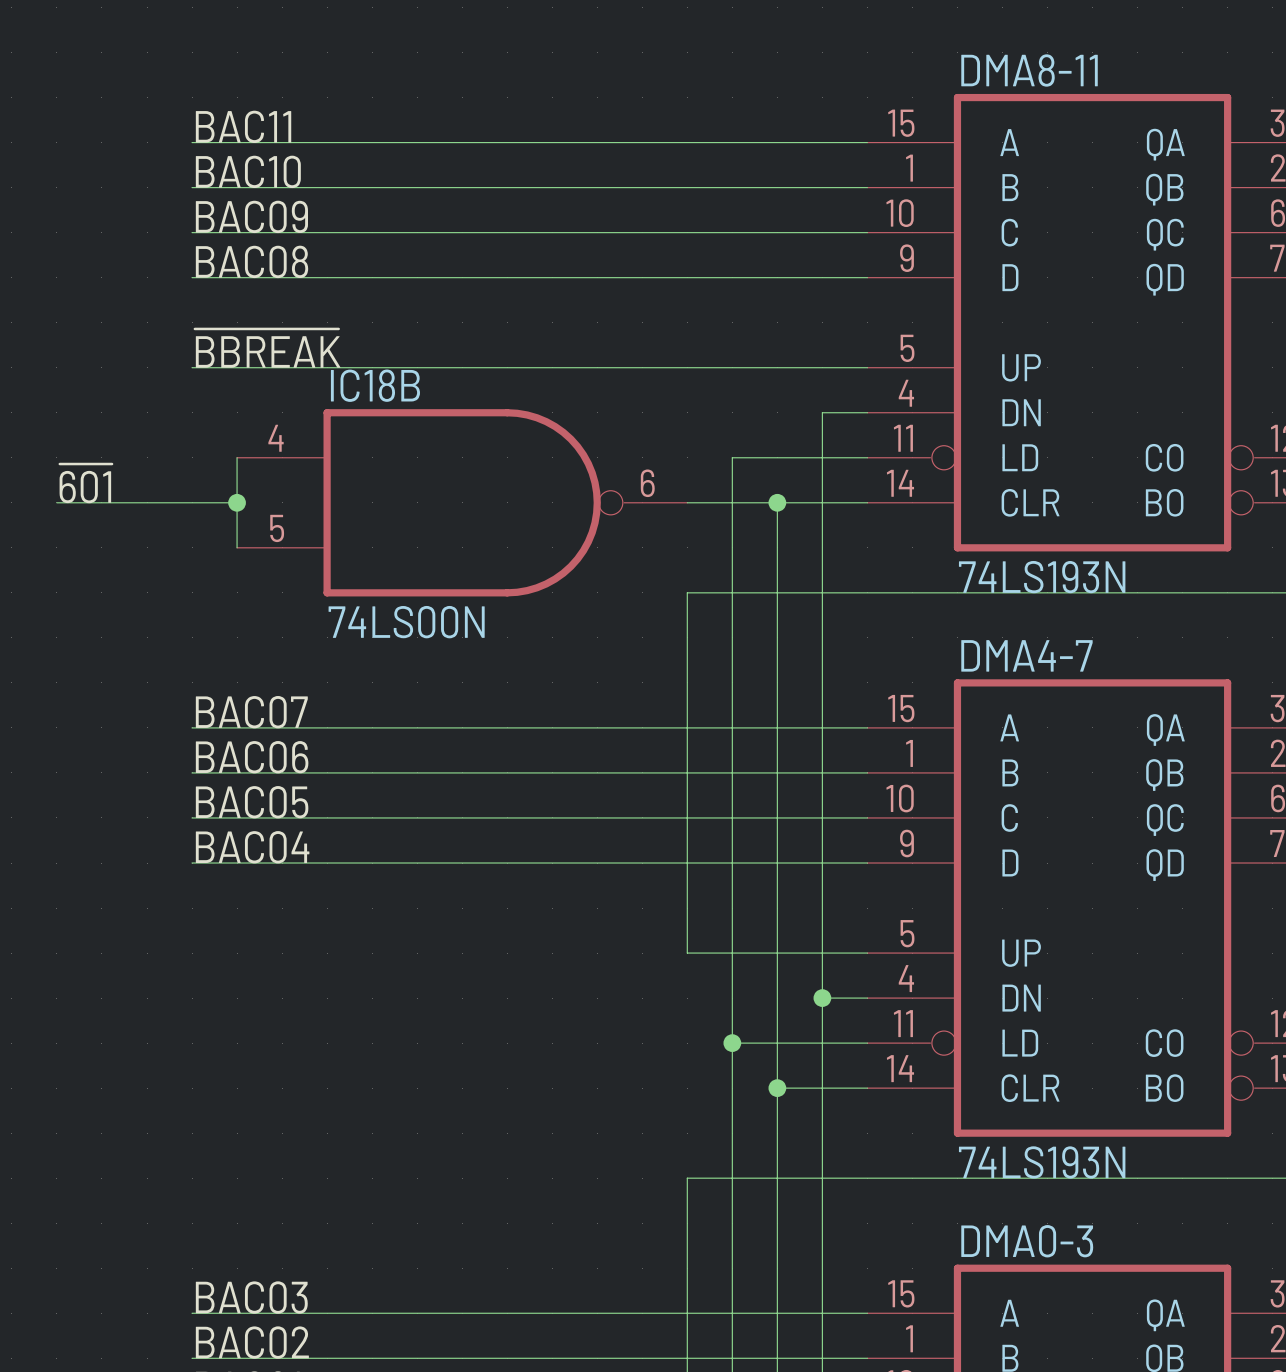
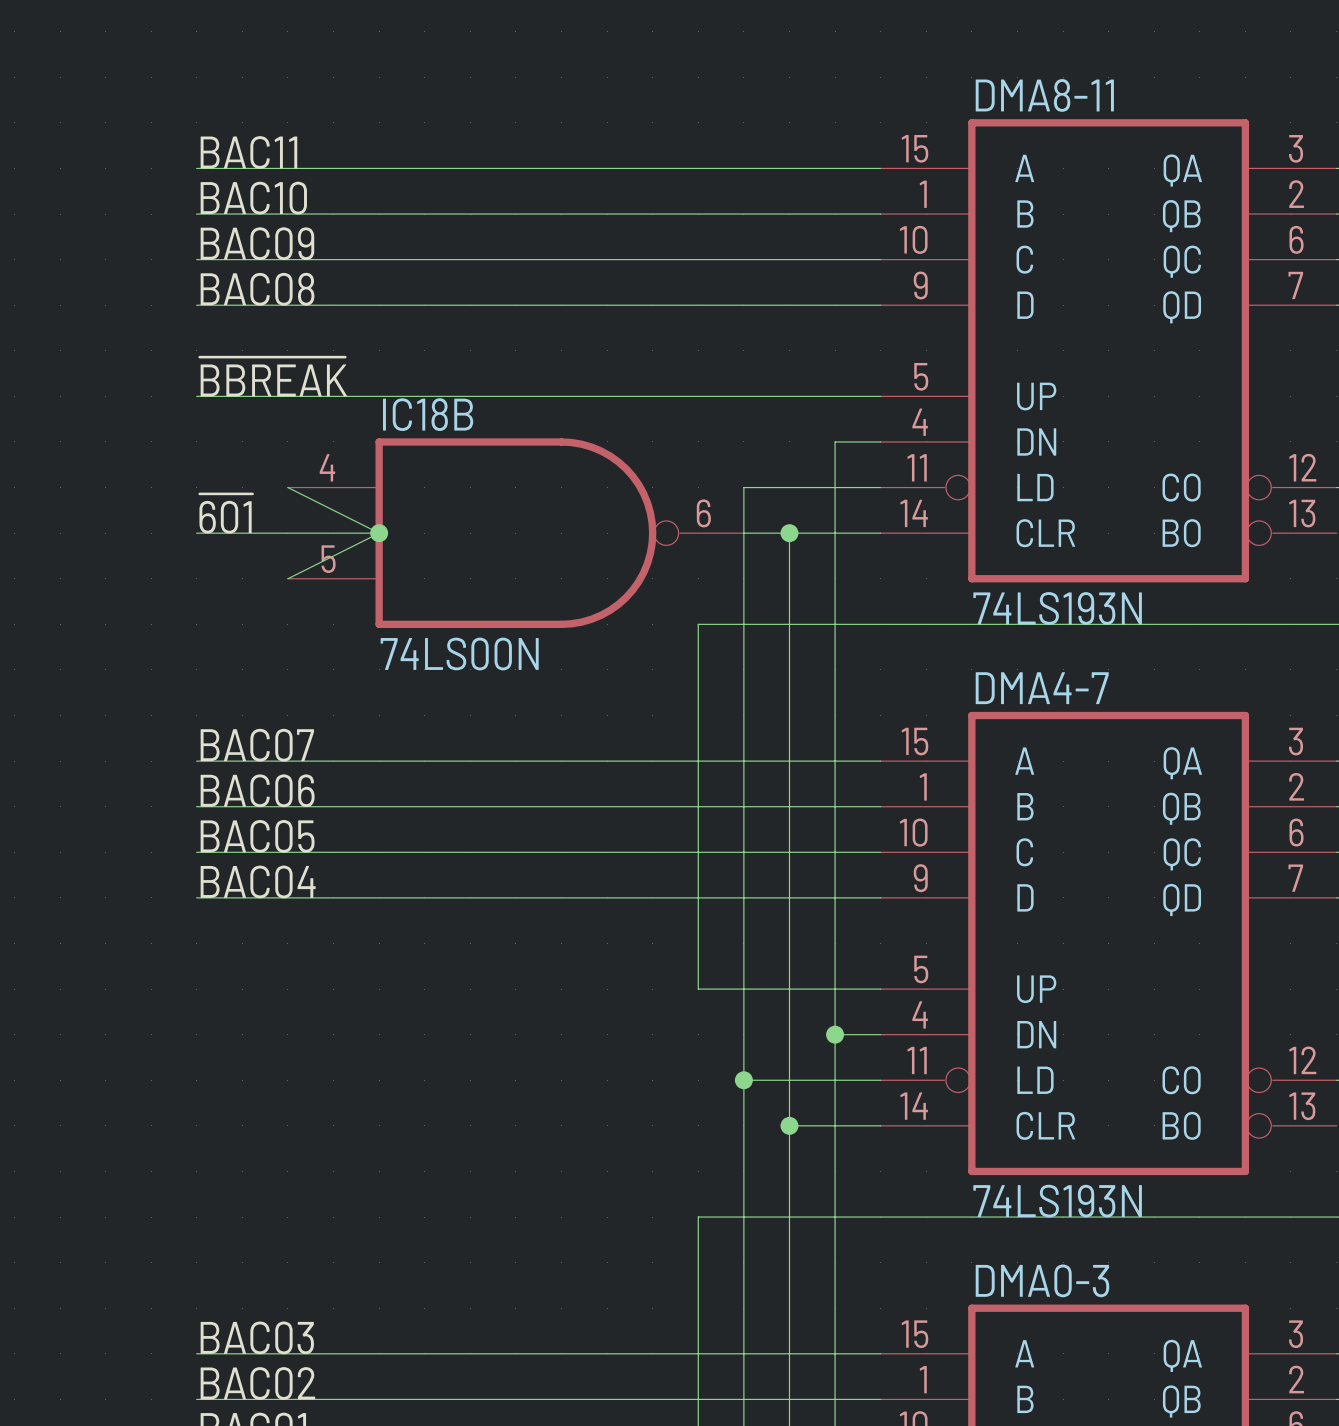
wire: (237, 457) (237, 547) -> none
wire: none -> (287, 487) (379, 533)
label position: ~{601} (85, 483) -> ~{601} (226, 513)
wire: (56, 502) (192, 502) -> (242, 533) (379, 533)
junction: (237, 502) -> none
wire: none -> (379, 533) (287, 578)
junction: none -> (379, 533)
IC18B position: (462, 502) -> (515, 533)

